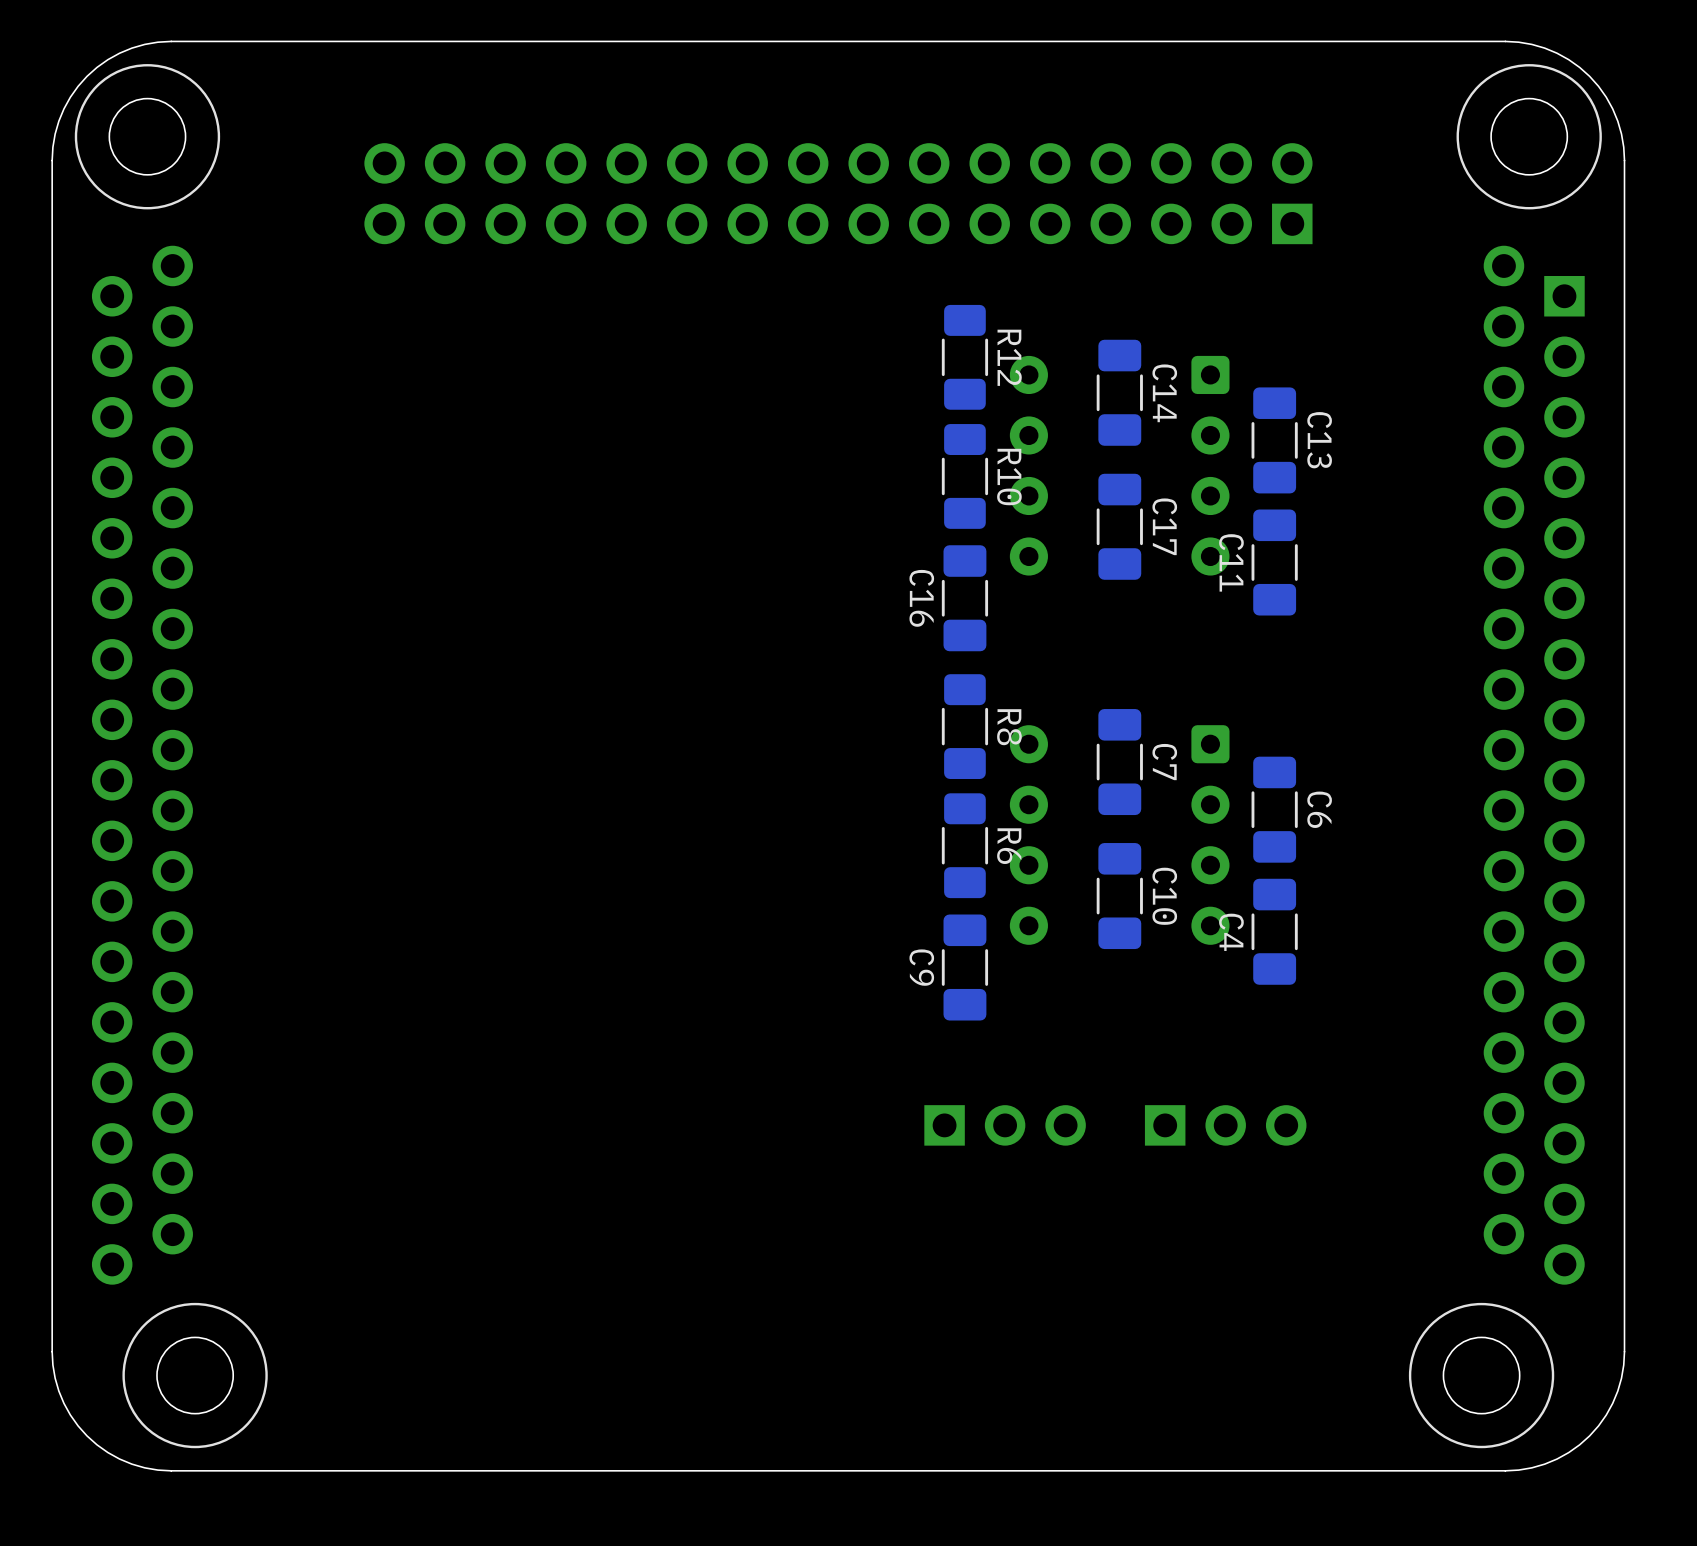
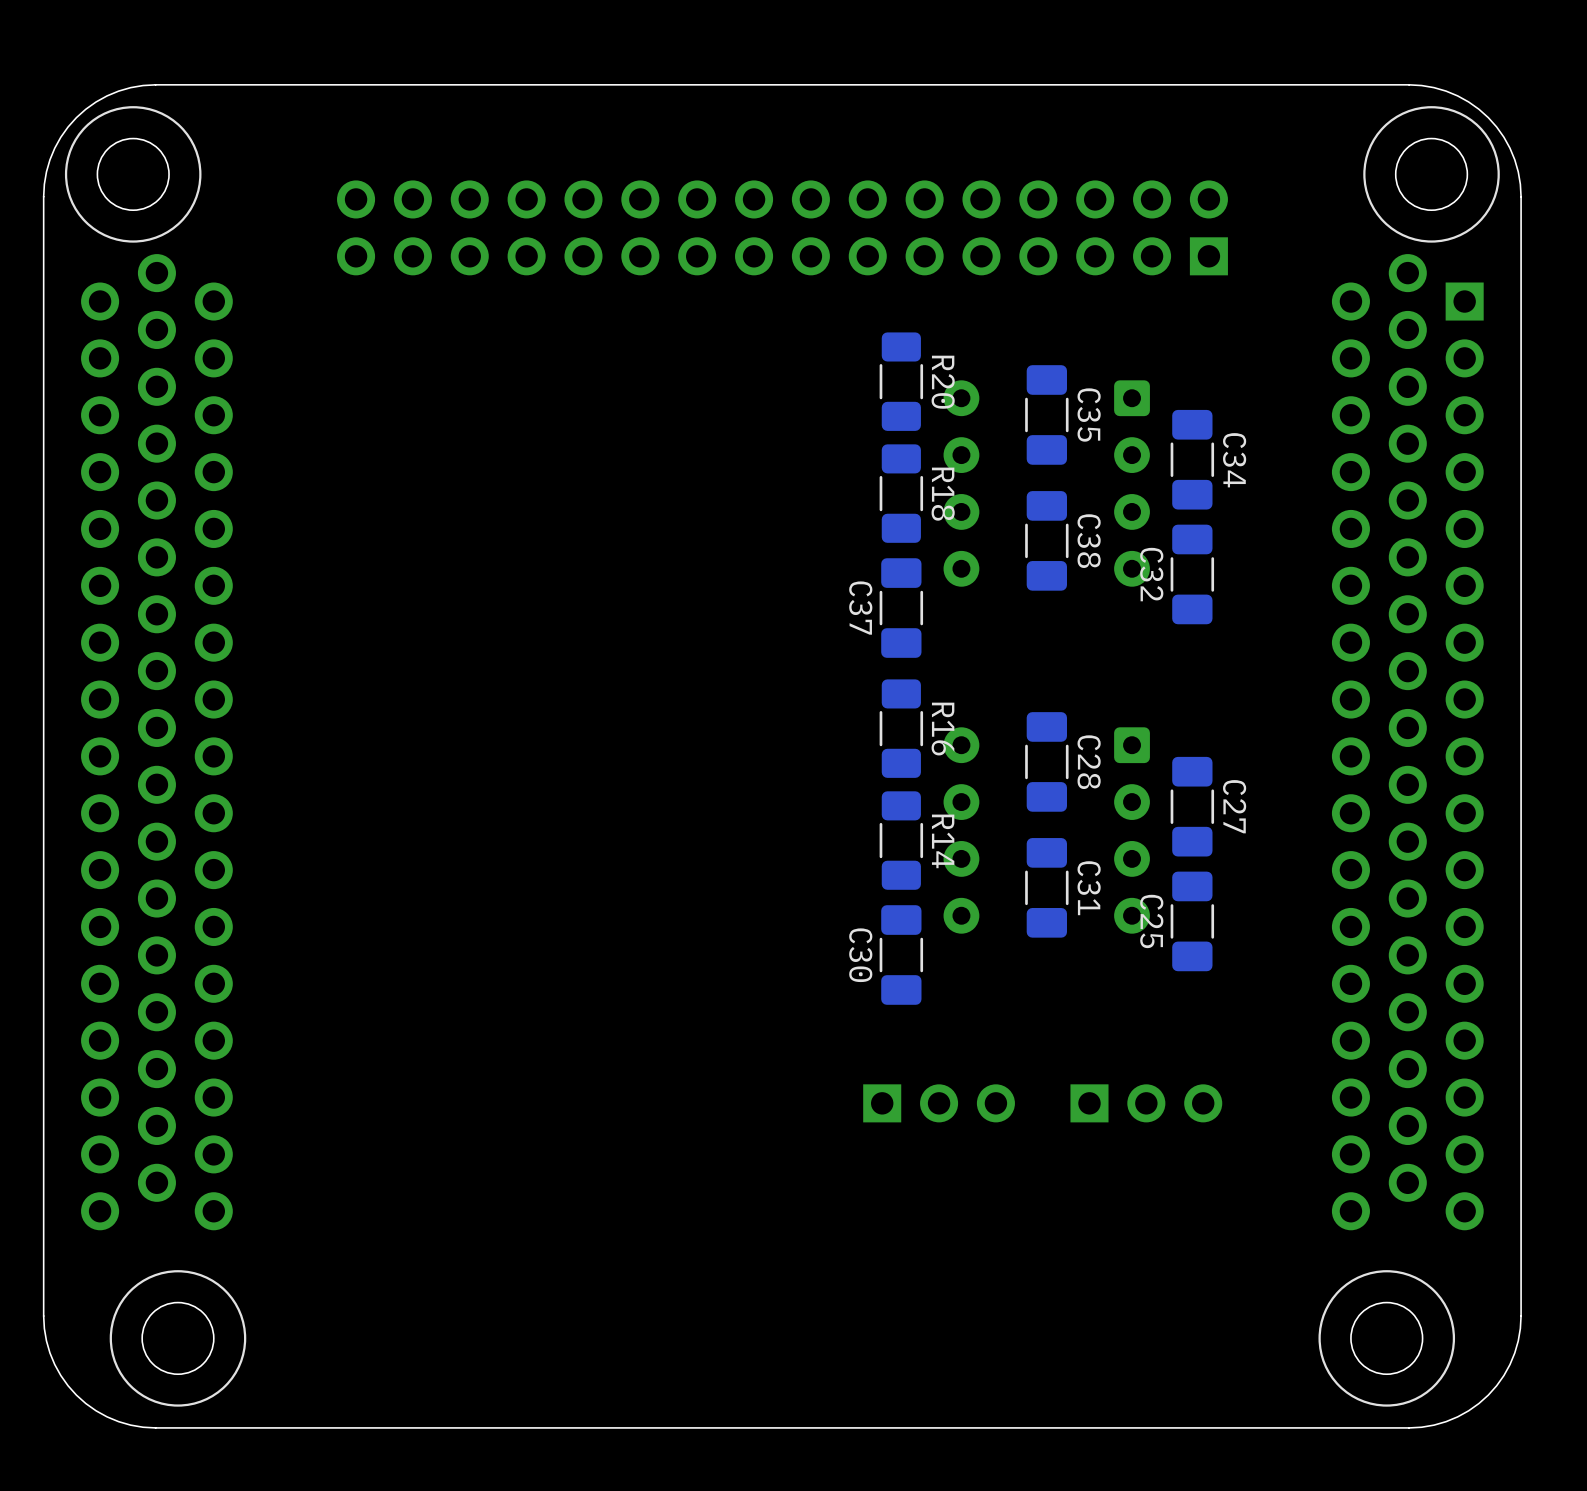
part footprint: [51, 40, 1626, 1472] -> [43, 84, 1522, 1429]
R12 name: R12 (1009, 357) -> R20 (943, 382)
C14 name: C14 (1164, 393) -> C35 (1089, 415)
C13 name: C13 (1319, 440) -> C34 (1234, 460)
R10 name: R10 (1009, 477) -> R18 (943, 494)
C17 name: C17 (1164, 526) -> C38 (1089, 541)
C11 name: C11 (1231, 562) -> C32 (1151, 574)
C16 name: C16 (921, 598) -> C37 (860, 608)
R8 name: R8 (1009, 727) -> R16 (942, 729)
C7 name: C7 (1164, 762) -> C28 (1089, 762)
C6 name: C6 (1319, 809) -> C27 (1234, 806)
R6 name: R6 (1009, 846) -> R14 (943, 841)
C10 name: C10 (1164, 896) -> C31 (1089, 888)
C4 name: C4 (1231, 932) -> C25 (1151, 921)
C9 name: C9 (921, 967) -> C30 (860, 955)

